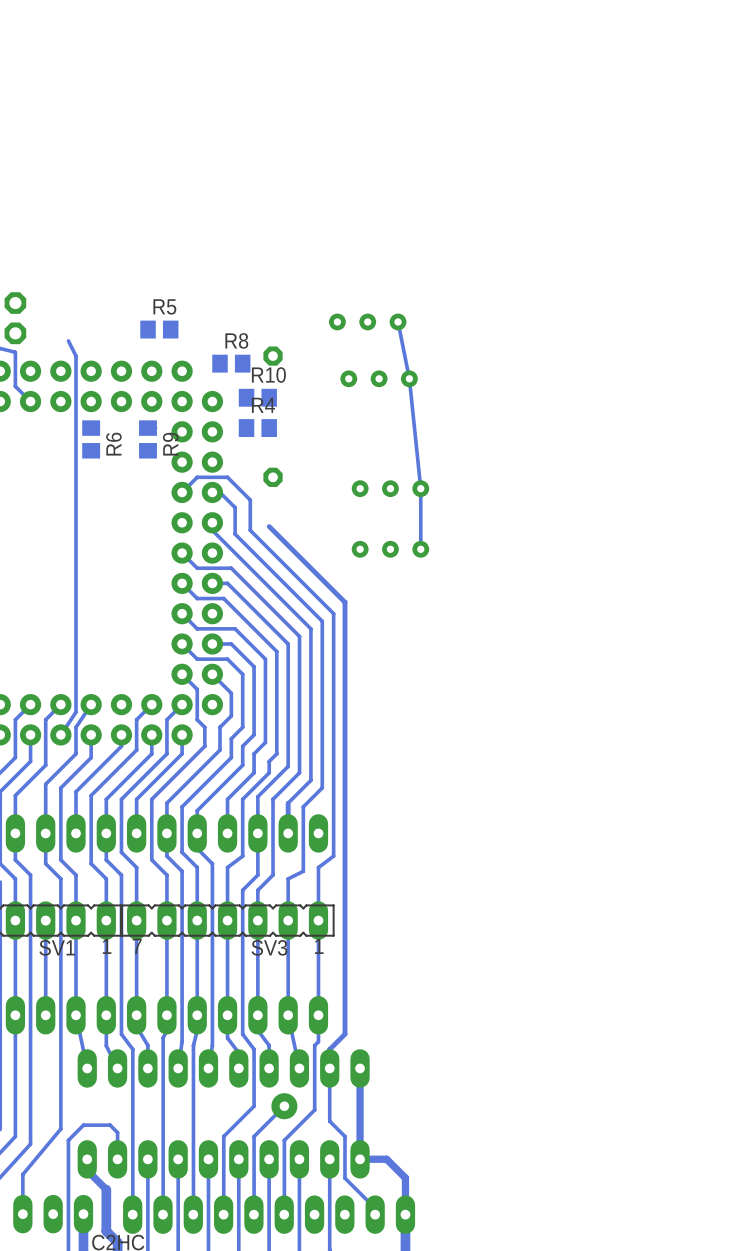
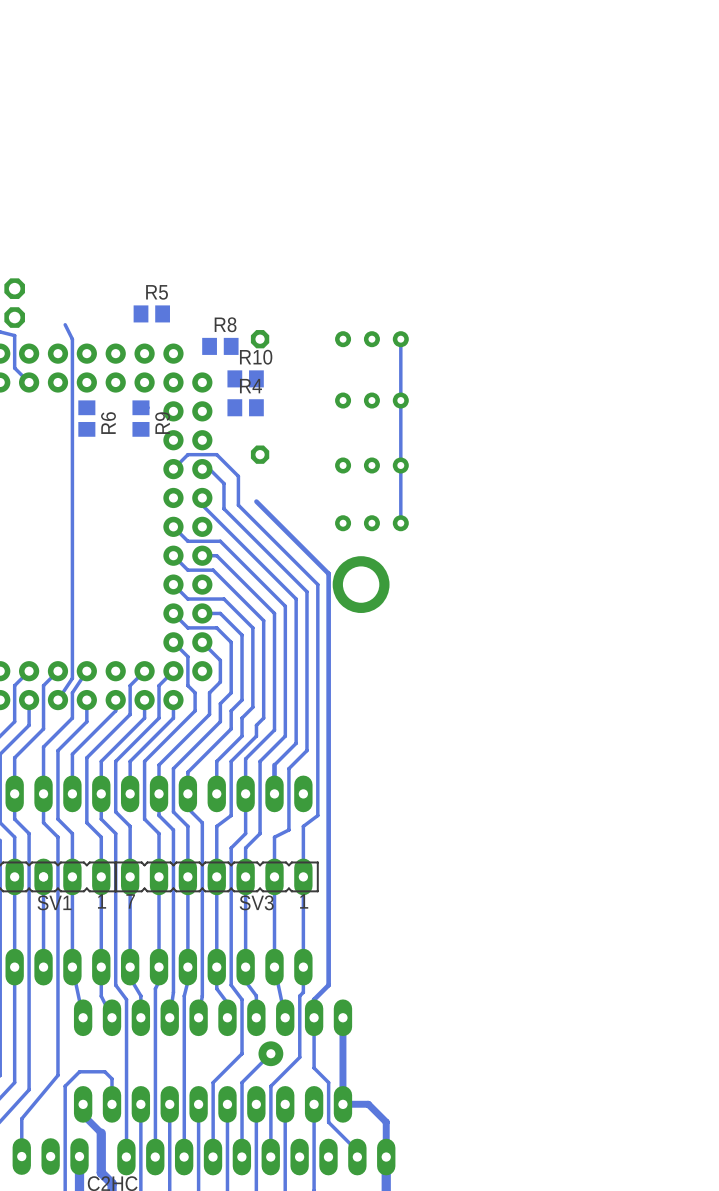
part: (367, 321) -> none
track: (398, 321) (409, 378) (420, 488) -> (400, 339) (400, 465)
part: none -> (371, 339)
part: (379, 378) -> none
part: none -> (371, 400)
via: none -> (361, 584)

